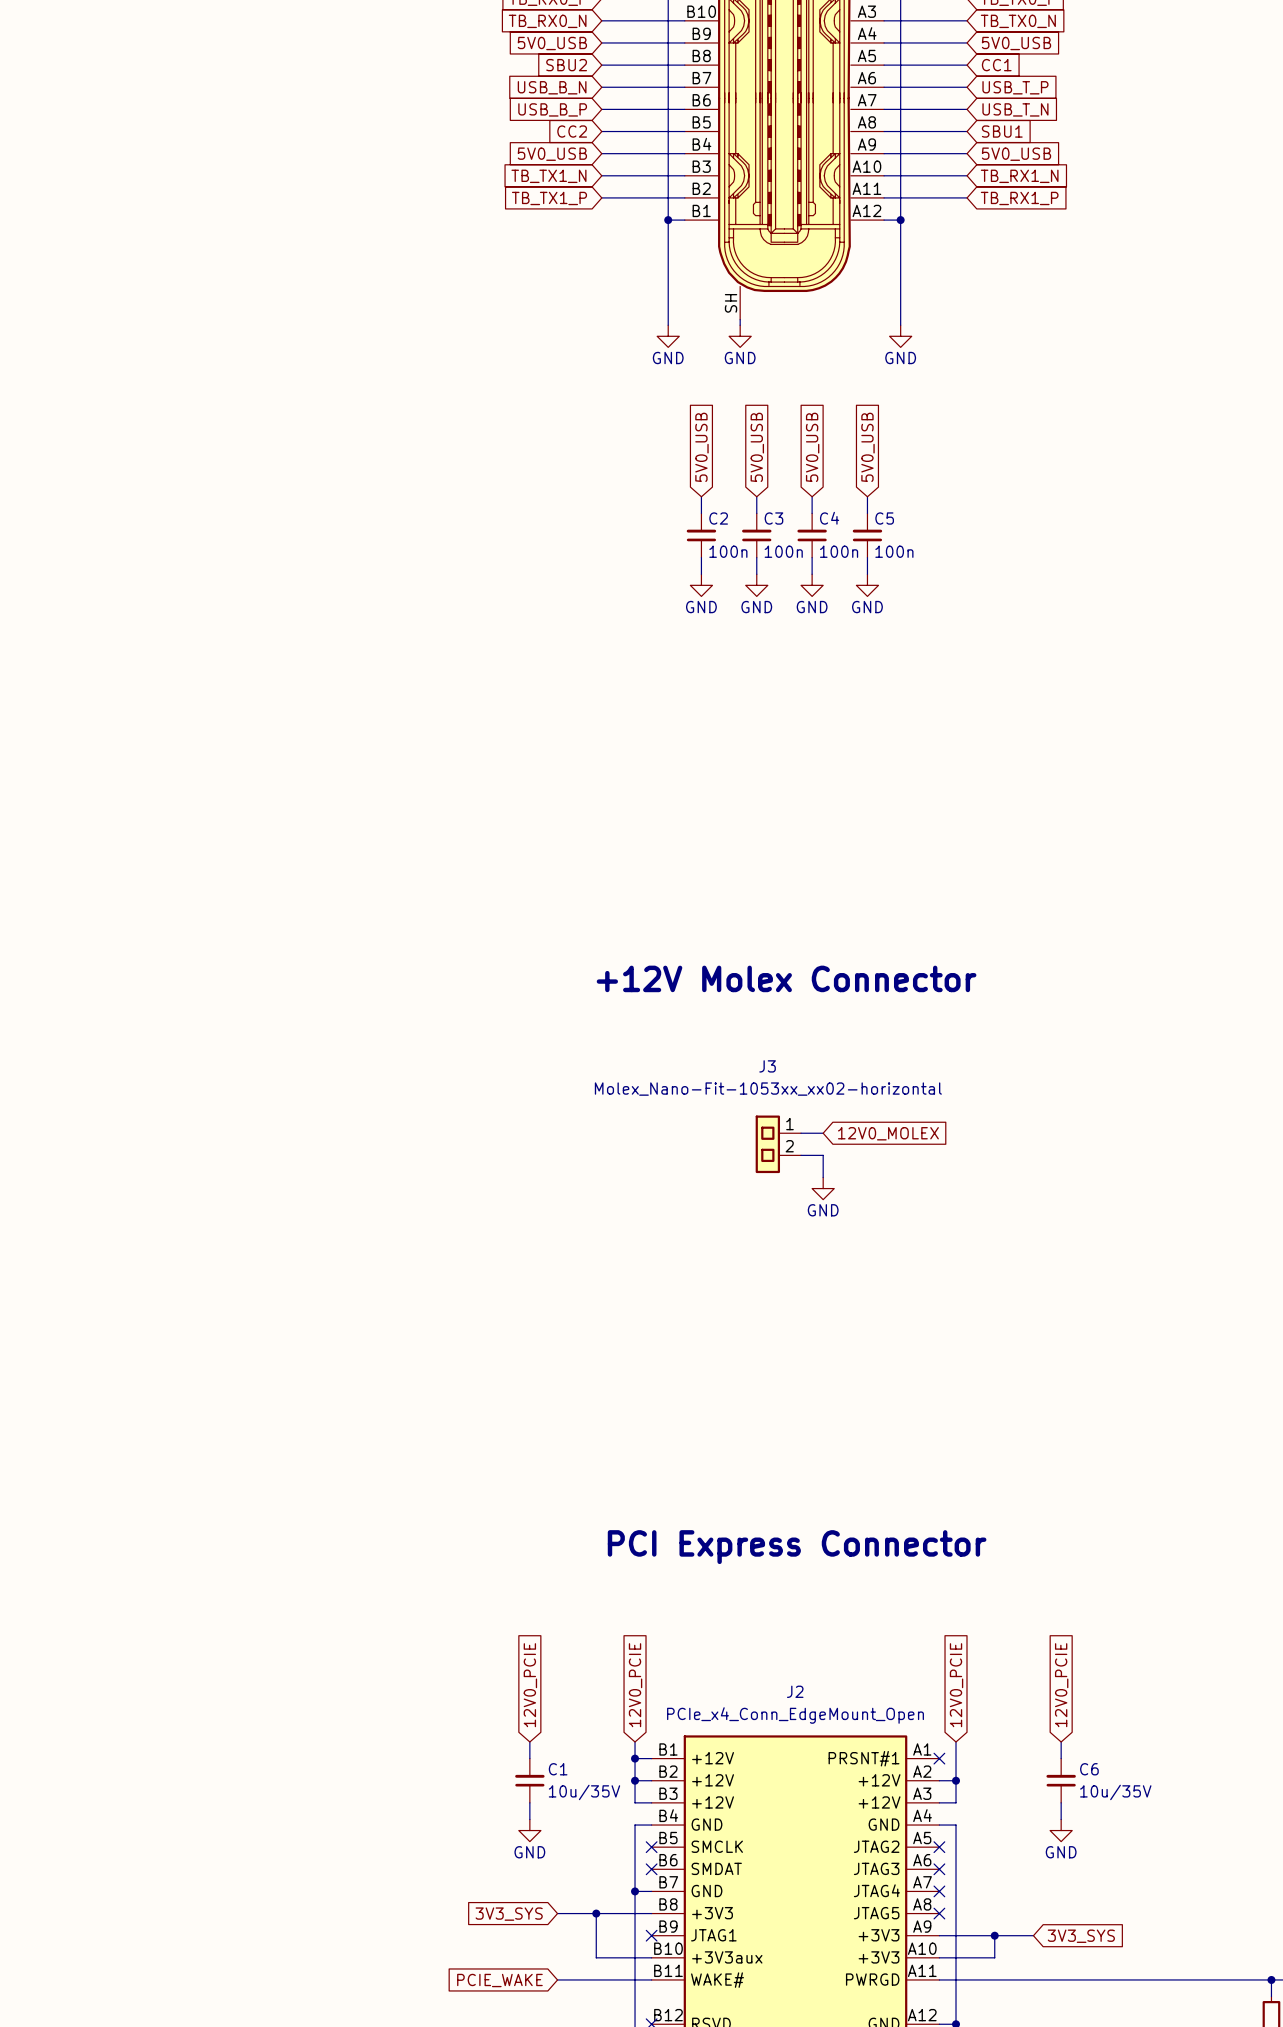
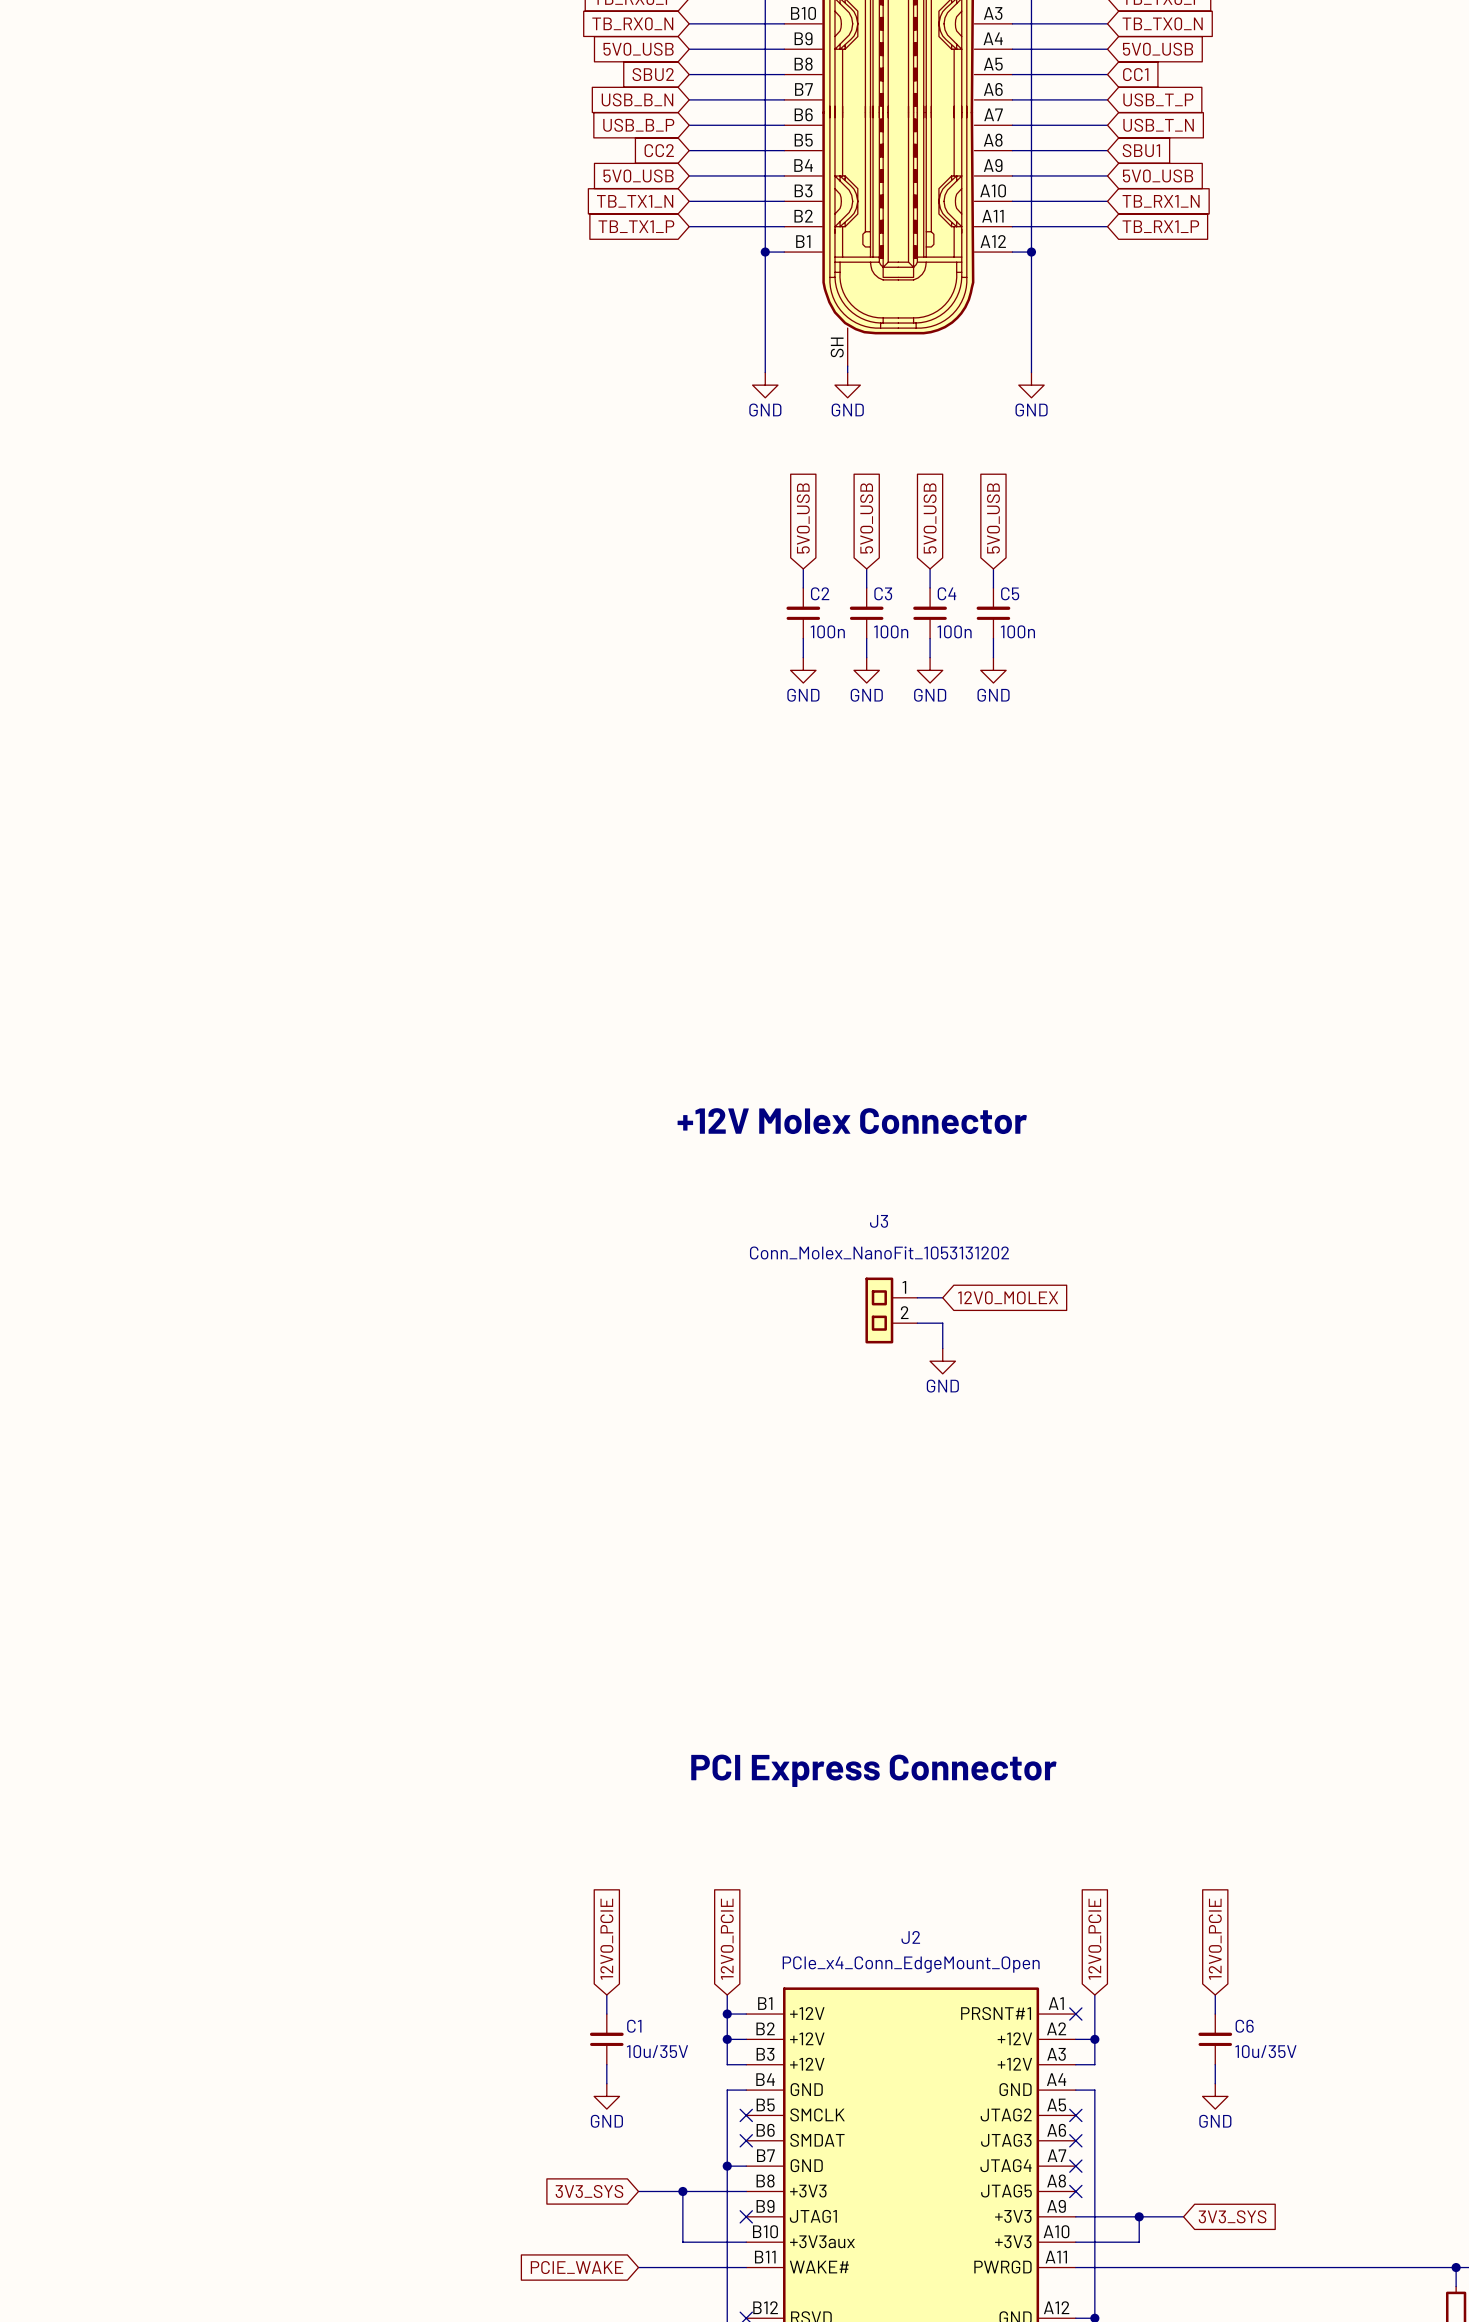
J3 value: Molex_Nano-Fit-1053xx_xx02-horizontal (768, 1089) -> Conn_Molex_NanoFit_1053131202 (879, 1252)

